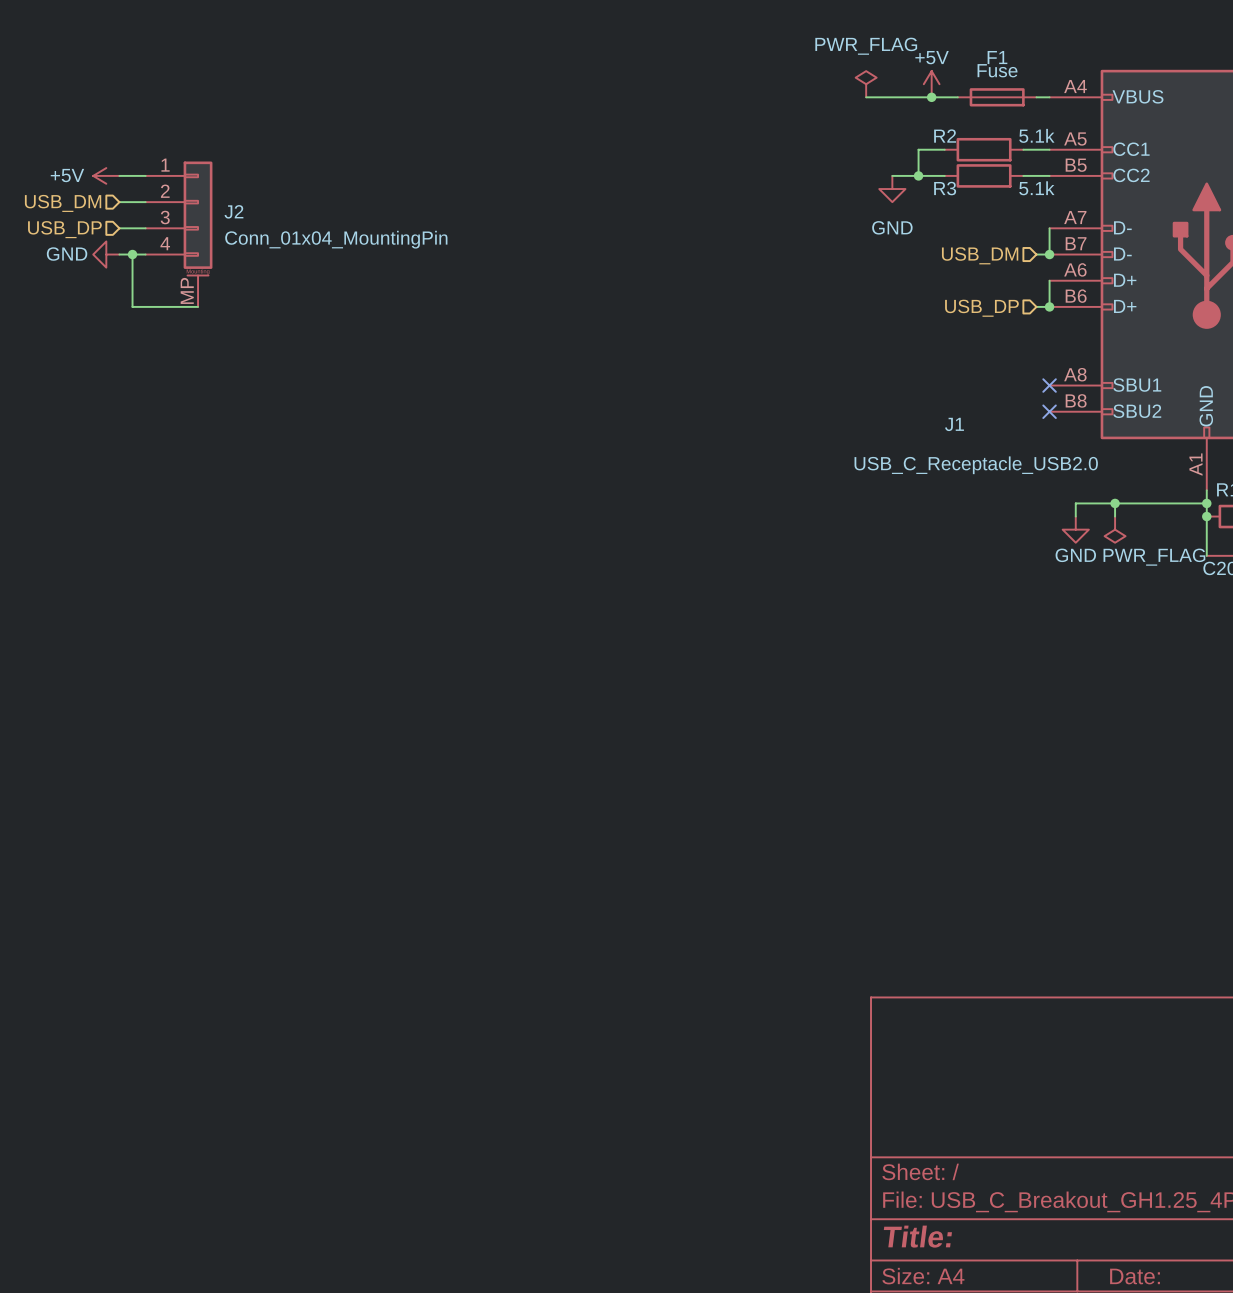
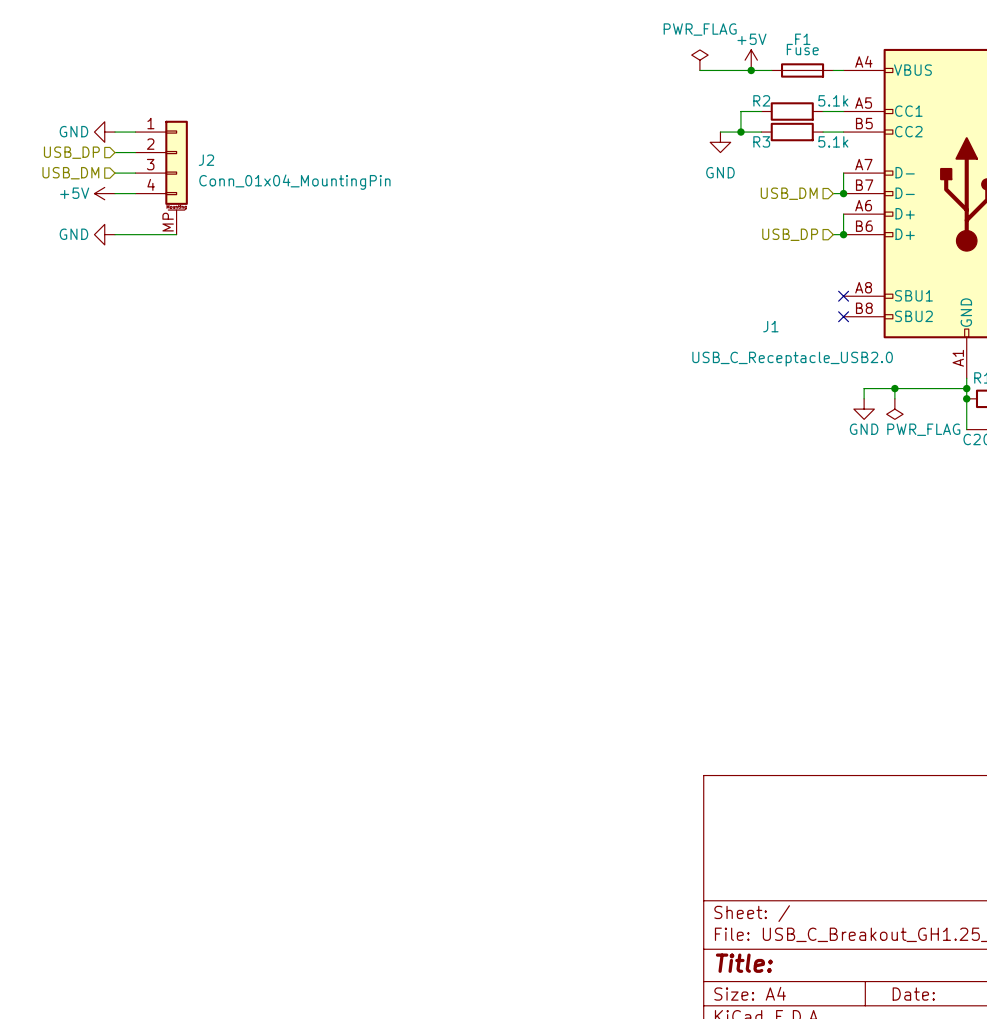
power symbol: +5V (106, 175) -> GND (104, 132)
hierarchical label: USB_DM (63, 203) -> USB_DP (71, 152)
hierarchical label: USB_DP (64, 229) -> USB_DM (70, 173)
power symbol: GND (106, 254) -> +5V (104, 193)
wire: (132, 254) (132, 306) -> (115, 234) (125, 234)
junction: (132, 254) -> none
power symbol: none -> GND (104, 234)

